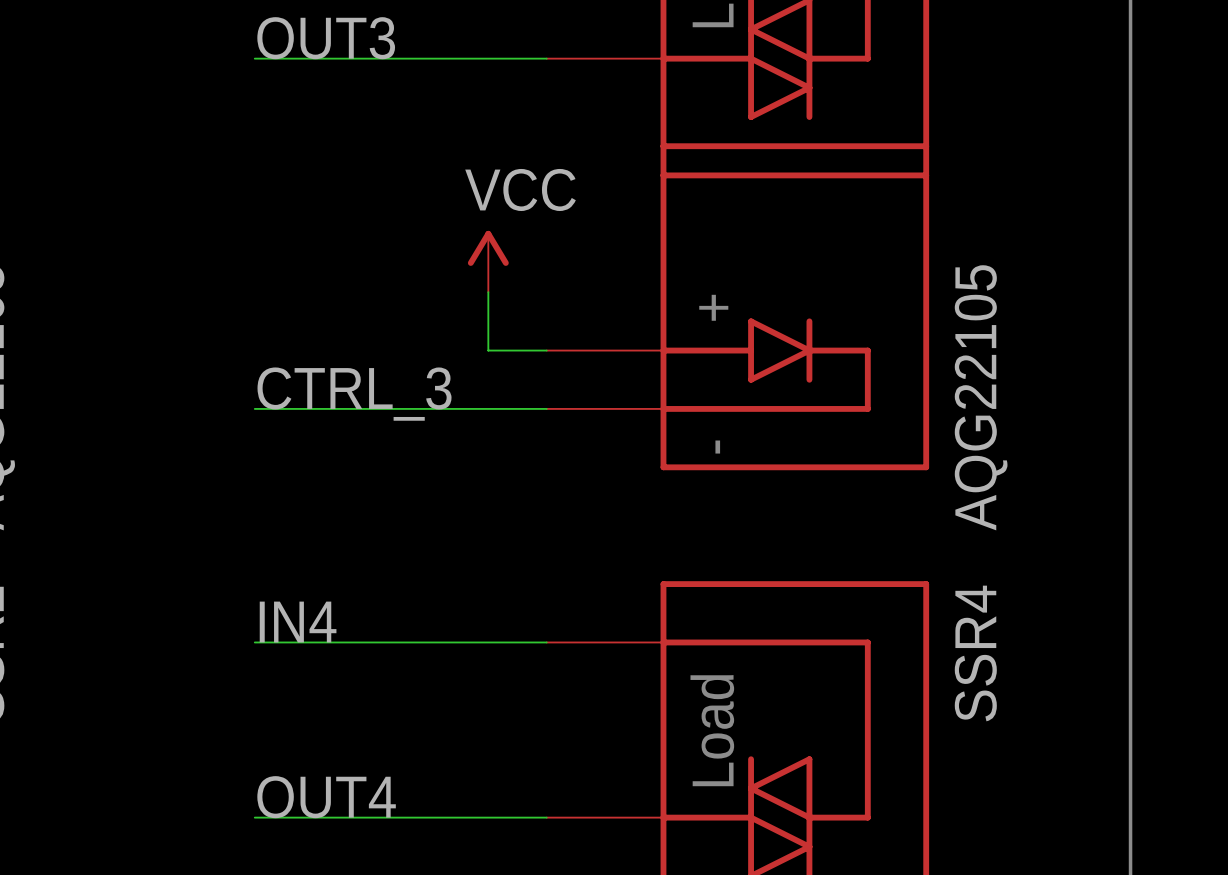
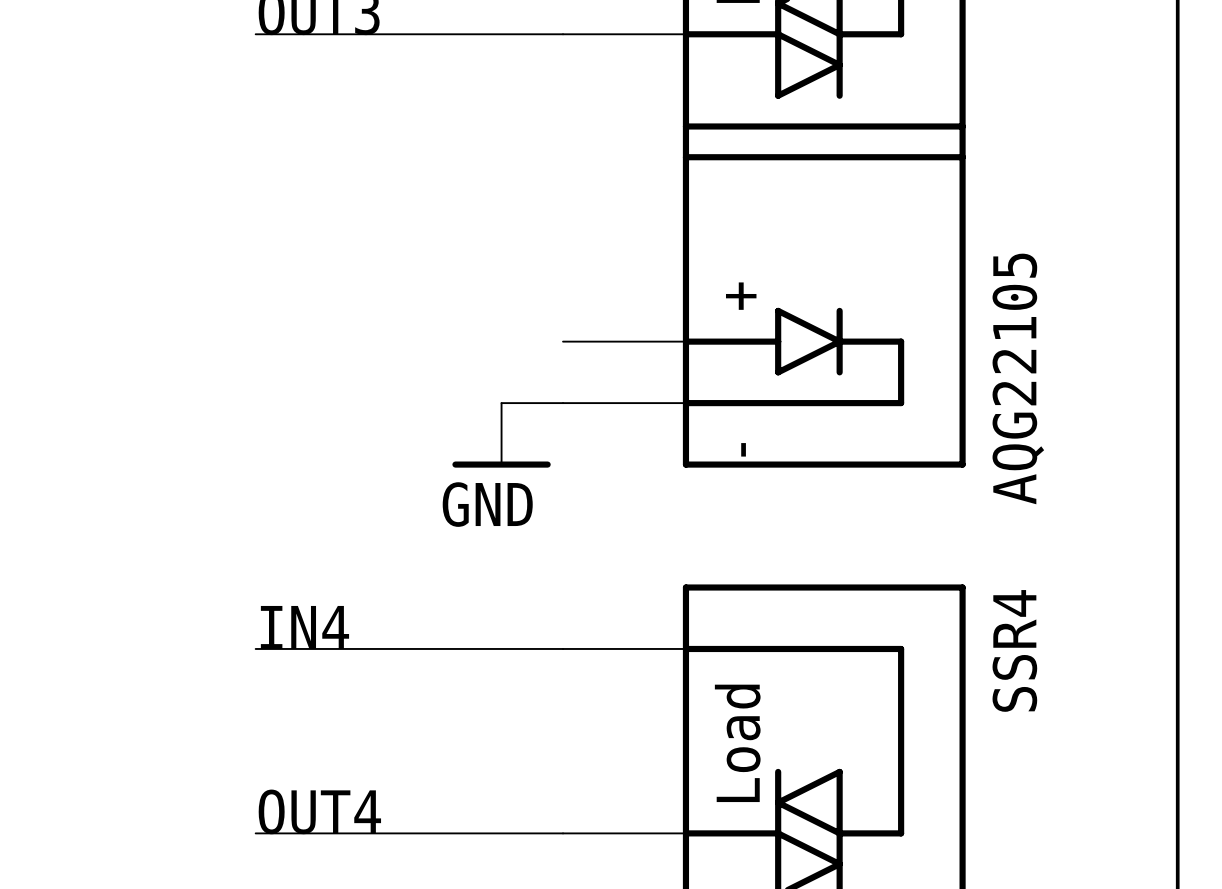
power symbol: VCC (488, 261) -> none
wire: (488, 292) (488, 350) (546, 350) -> none
label: CTRL_3 (354, 394) -> none
wire: (254, 408) (488, 408) -> none
power symbol: none -> GND (501, 435)

